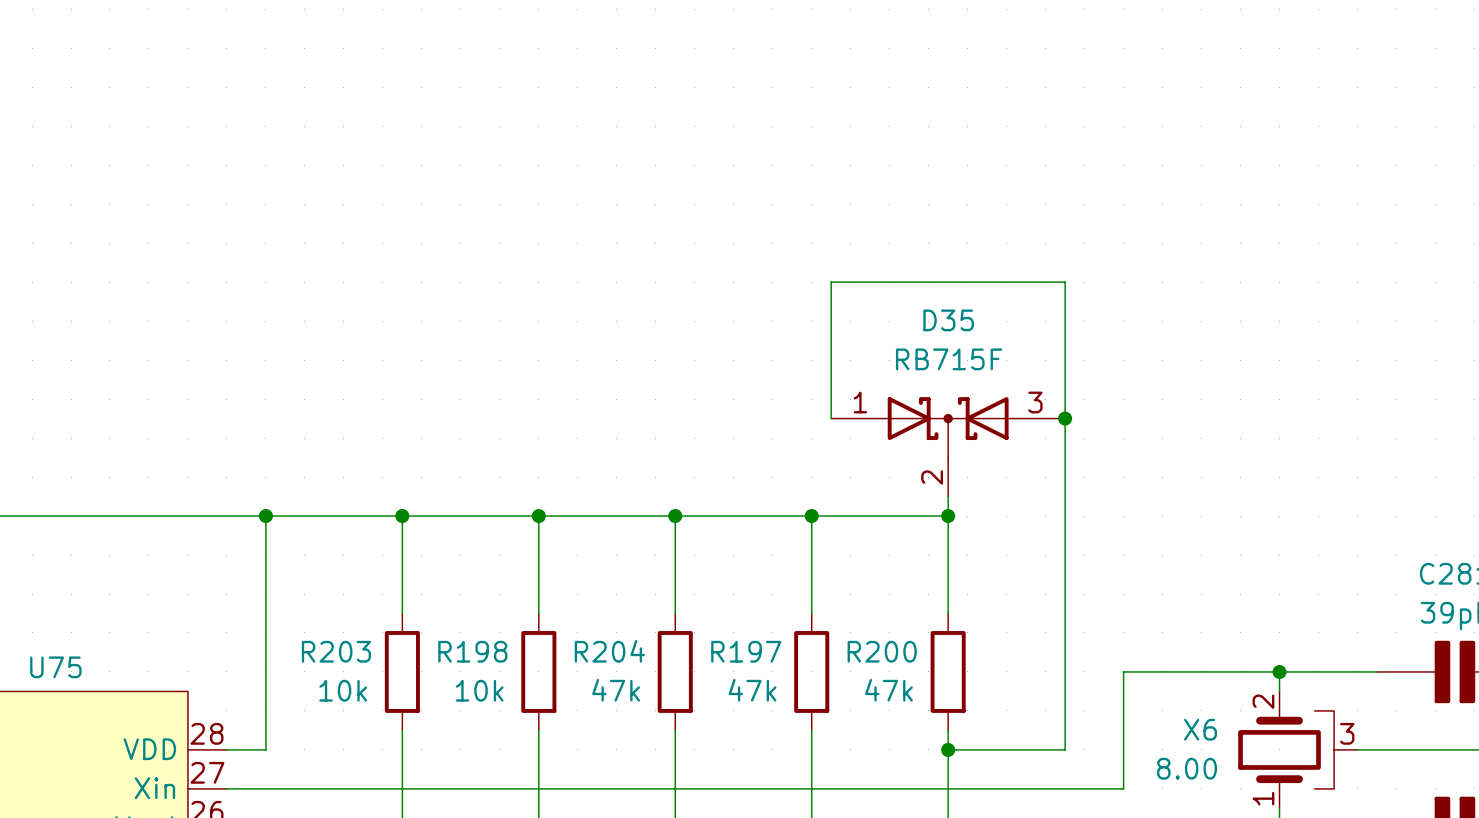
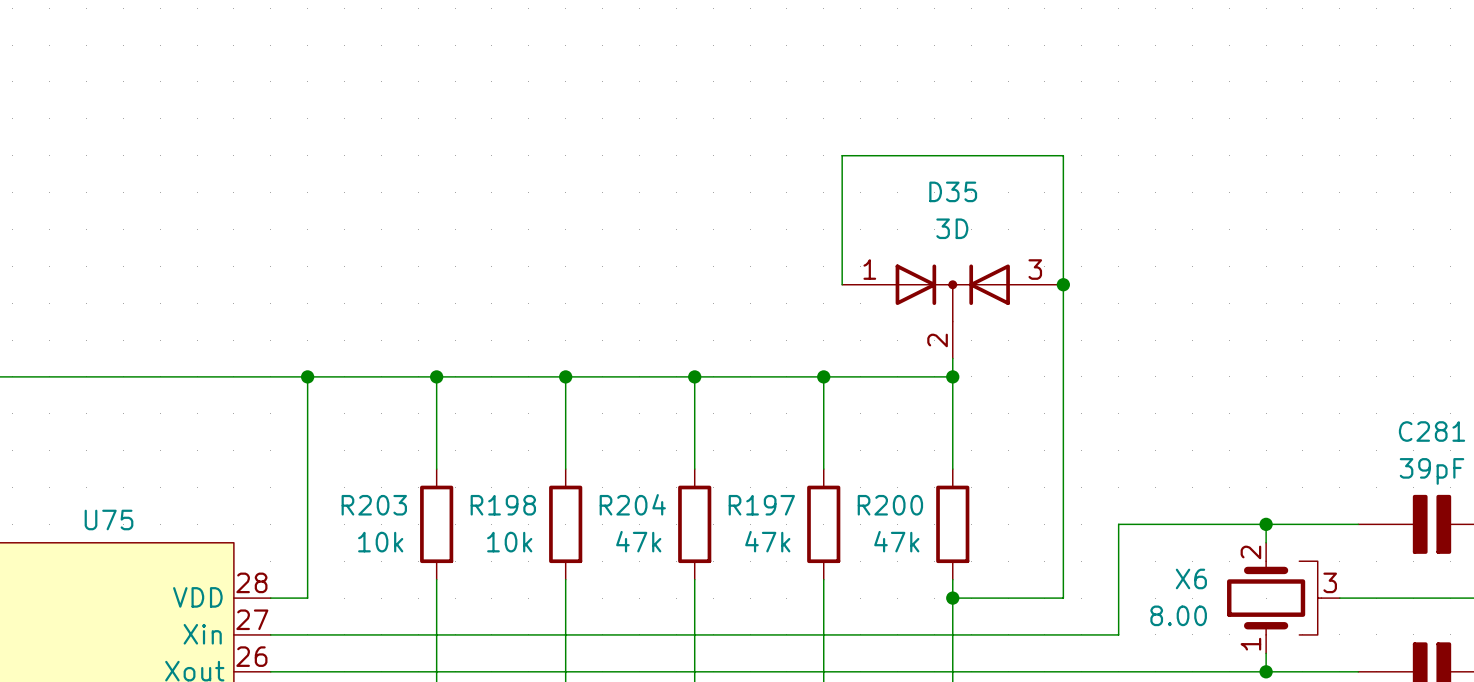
D35 value: RB715F (949, 359) -> 3D (952, 228)
D35 symbol: [831, 397, 1066, 497] -> [842, 264, 1064, 359]

